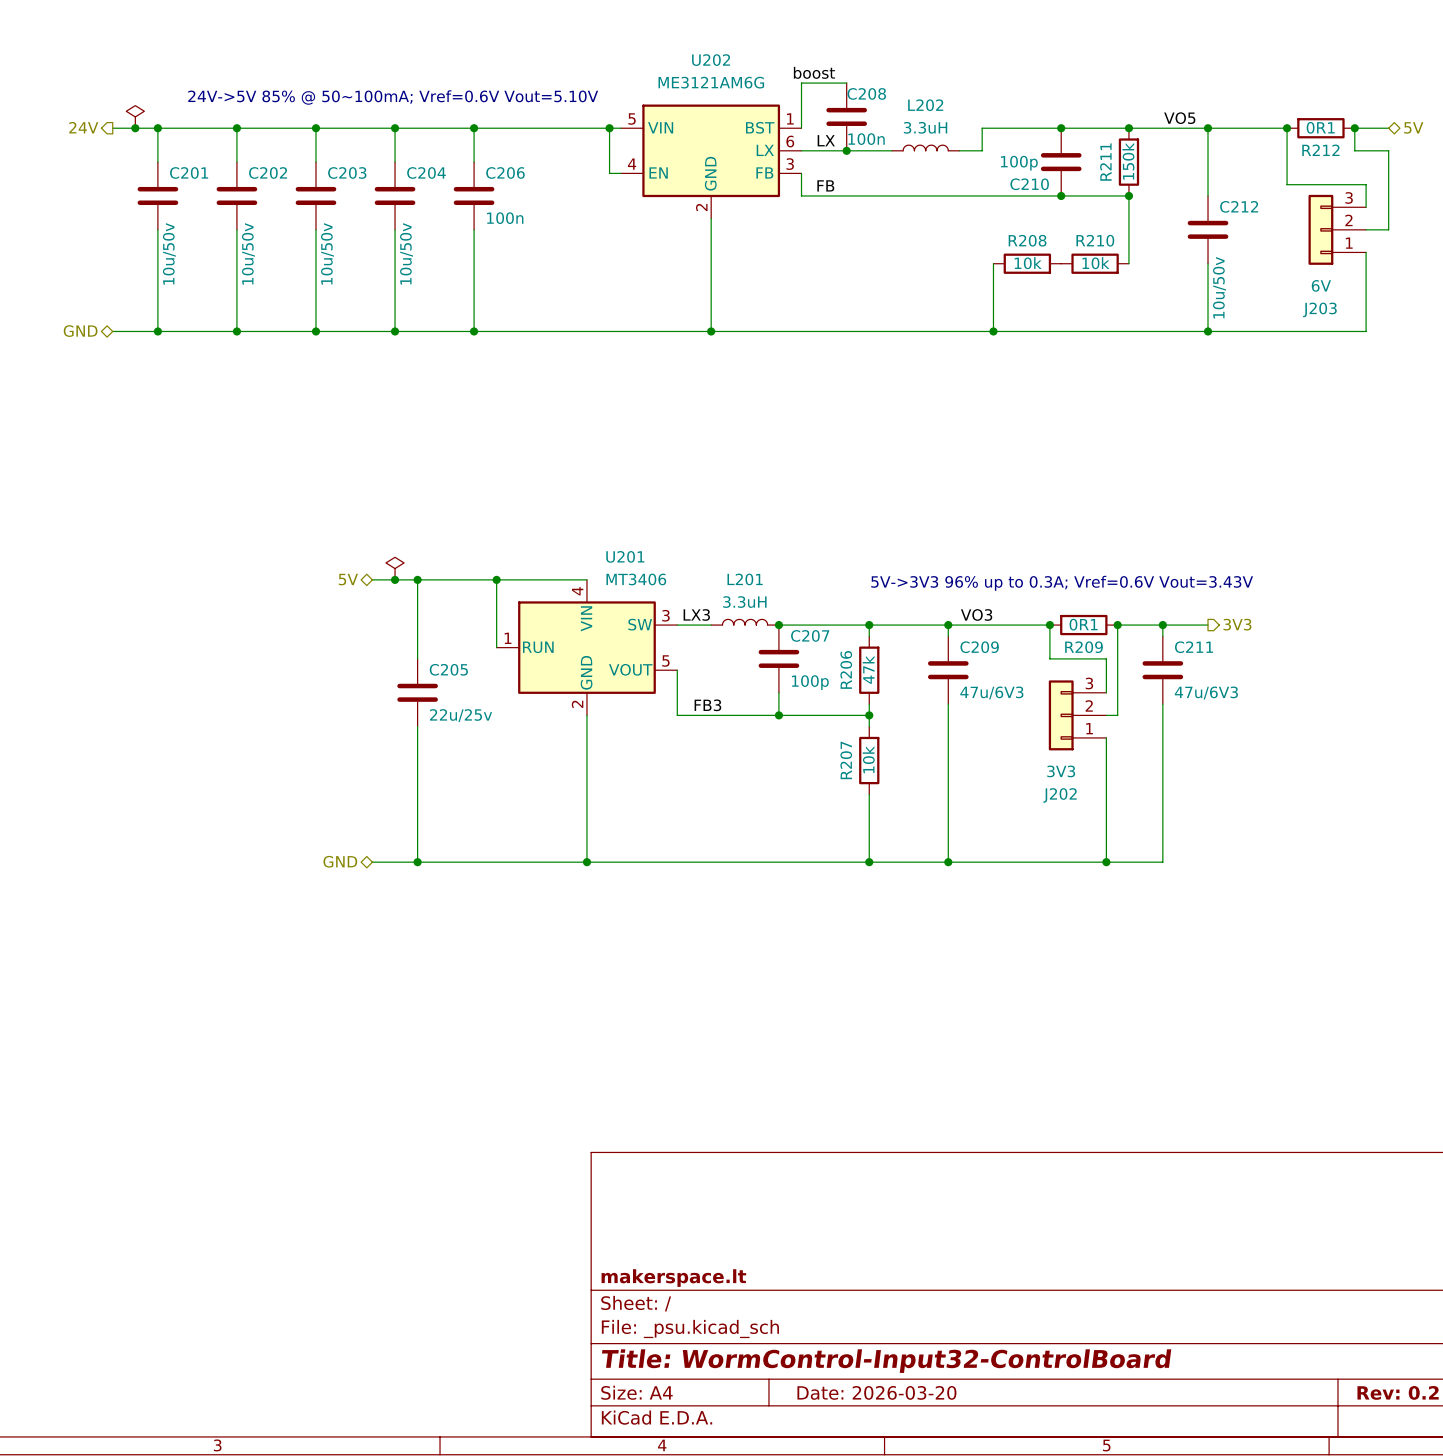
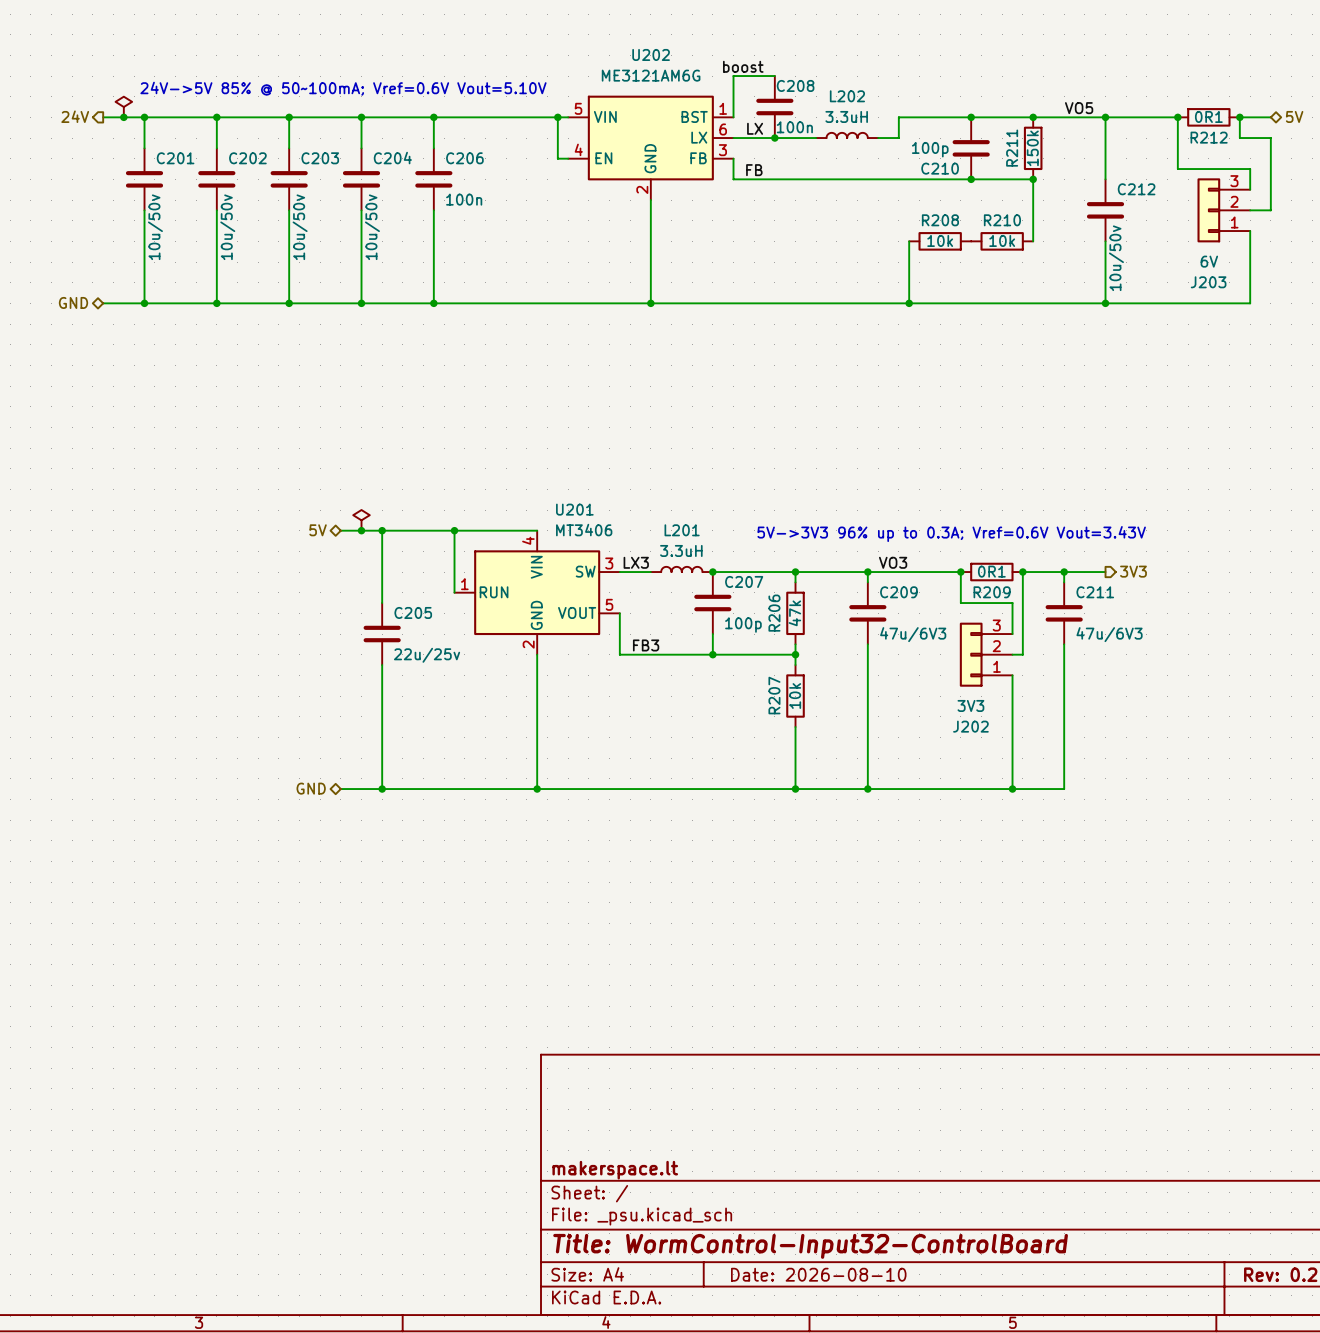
title block: Date: 2026-03-20 (876, 1392) -> Date: 2026-08-10 (818, 1274)

